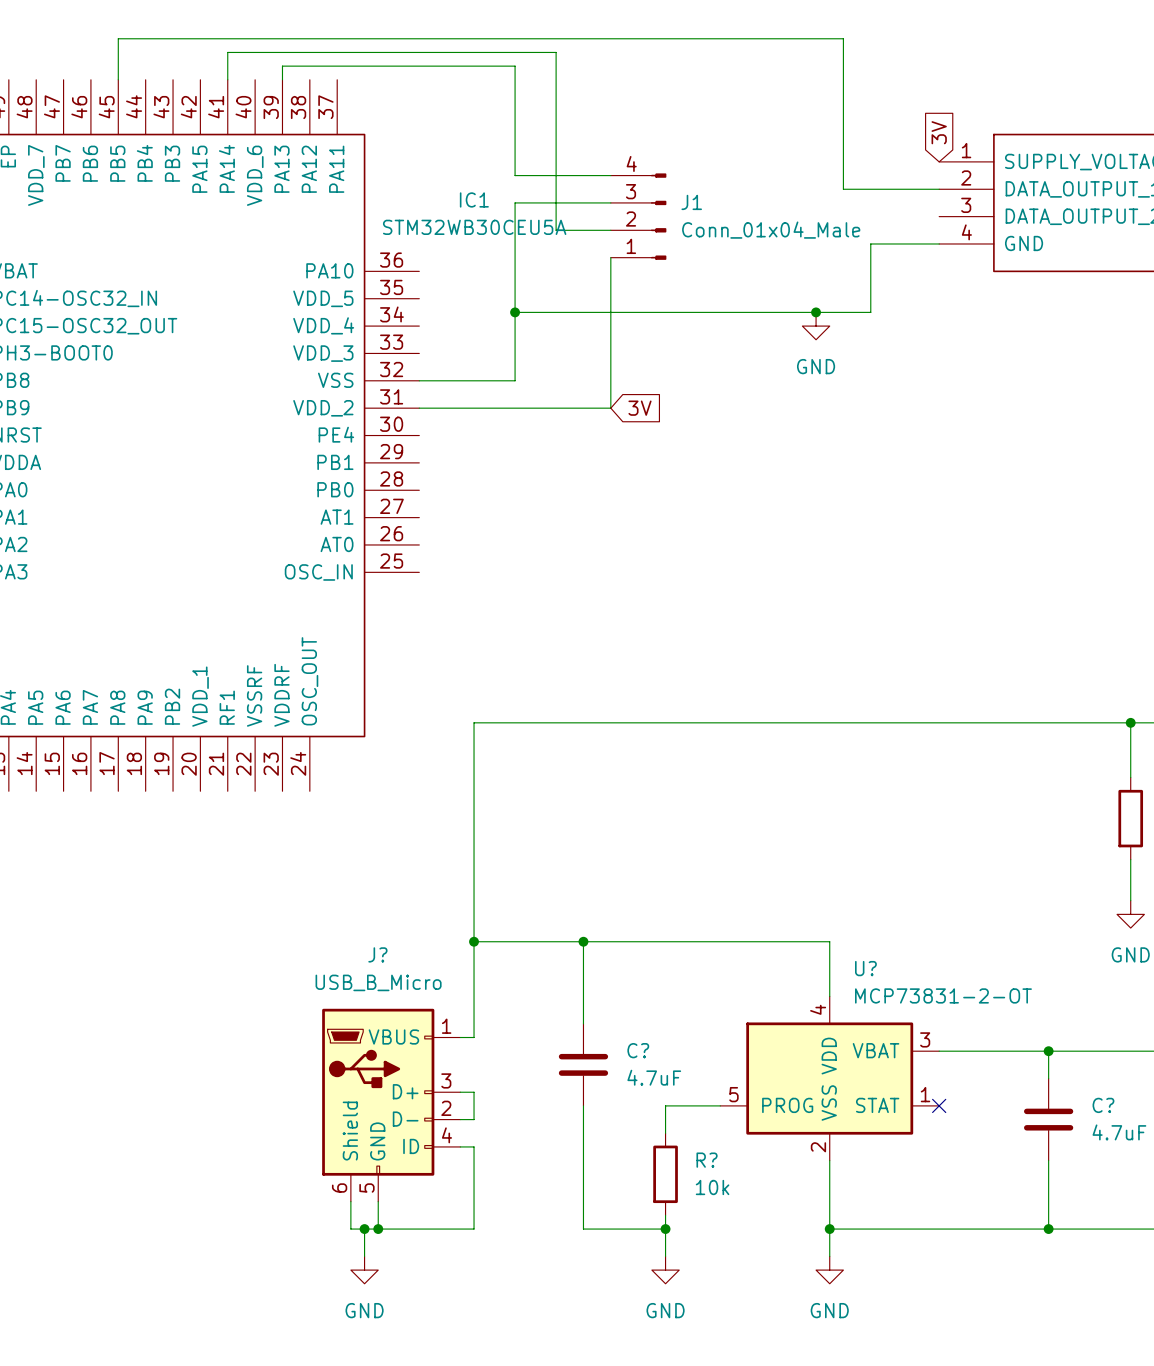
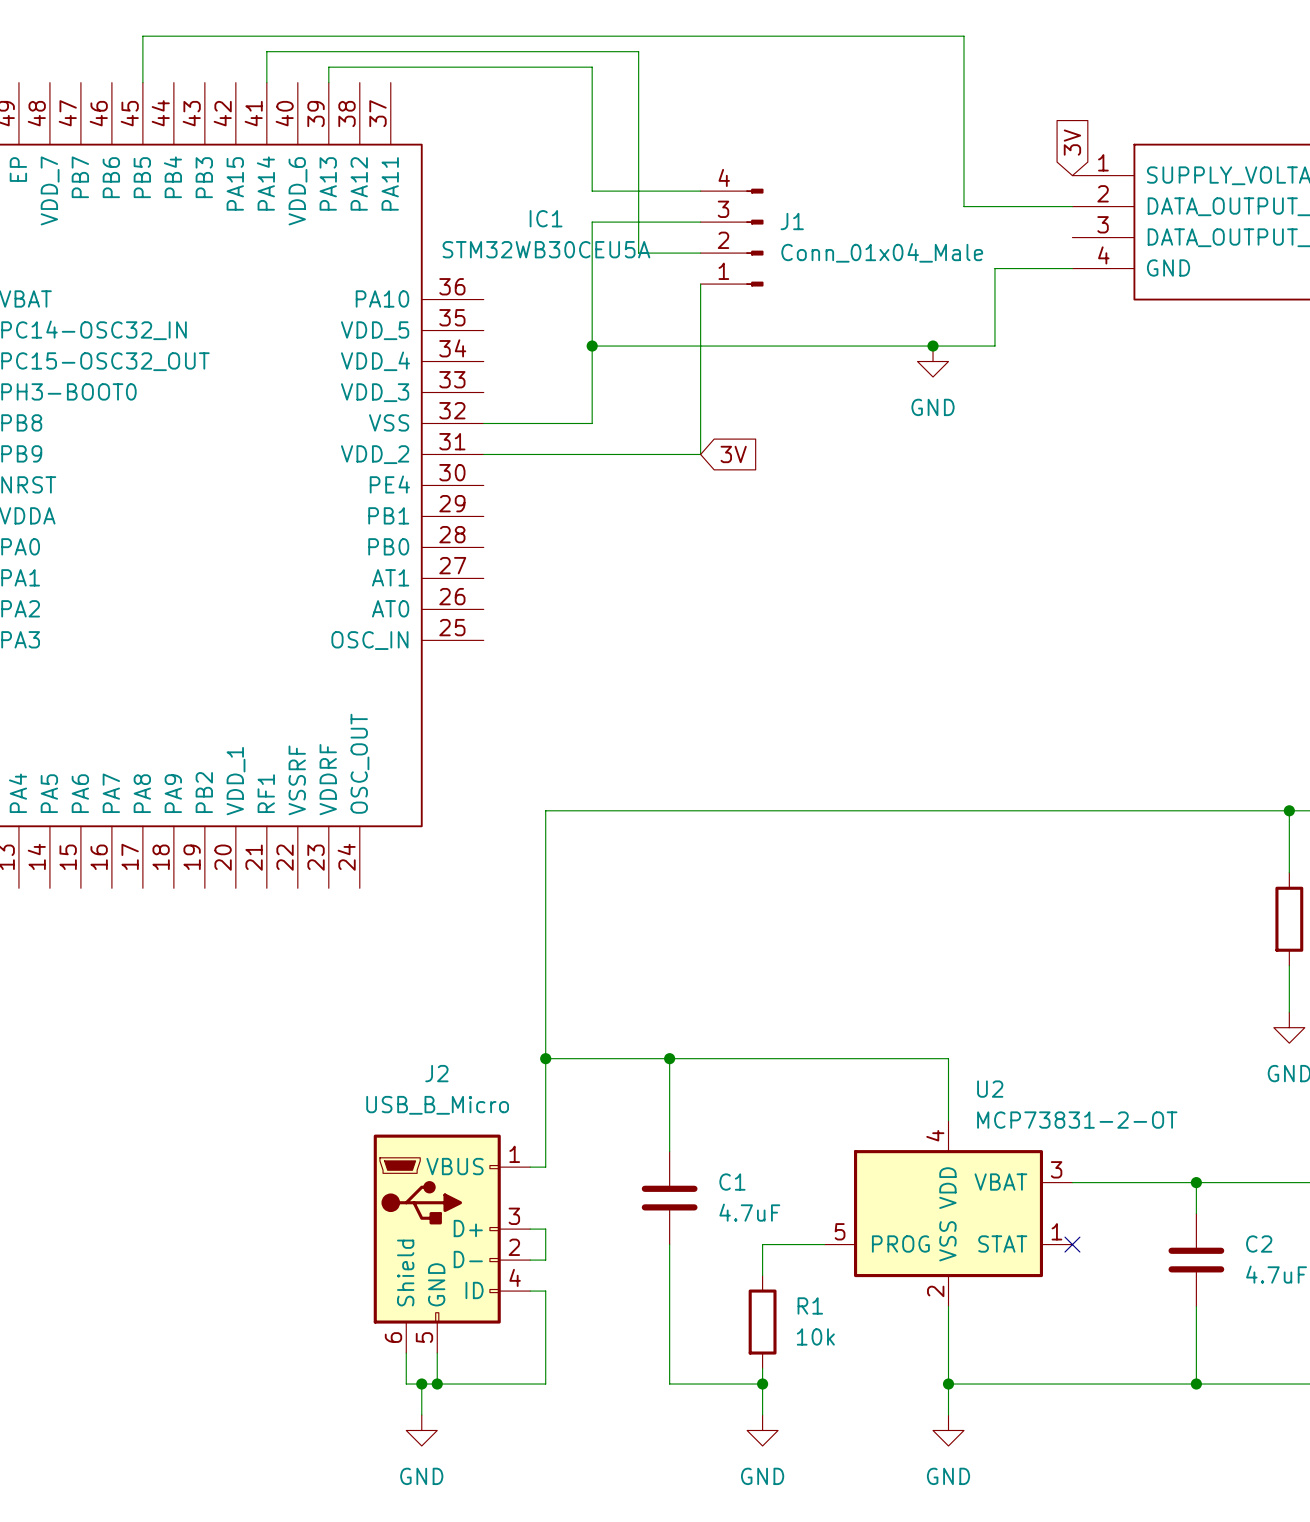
J? name: J? (377, 954) -> J2 (436, 1073)
U? name: U? (865, 968) -> U2 (990, 1089)
C? name: C? (638, 1050) -> C1 (732, 1182)
C? name: C? (1103, 1105) -> C2 (1259, 1244)
R? name: R? (707, 1160) -> R1 (810, 1305)

